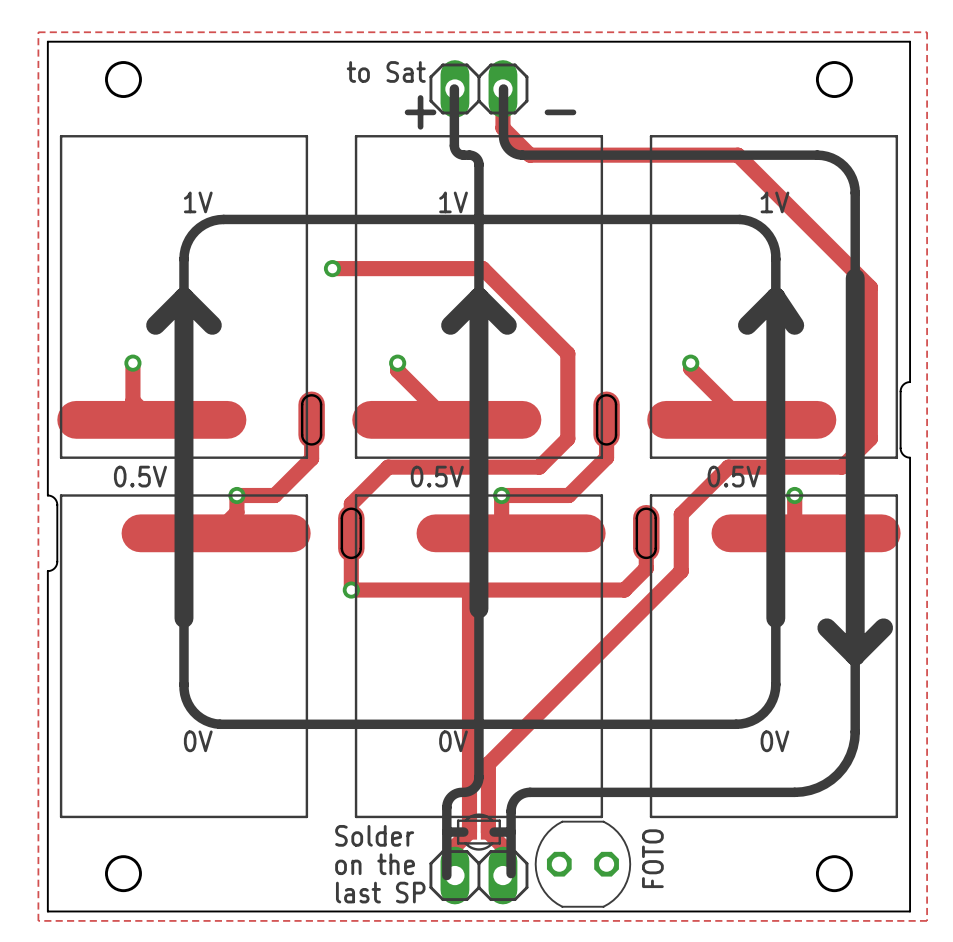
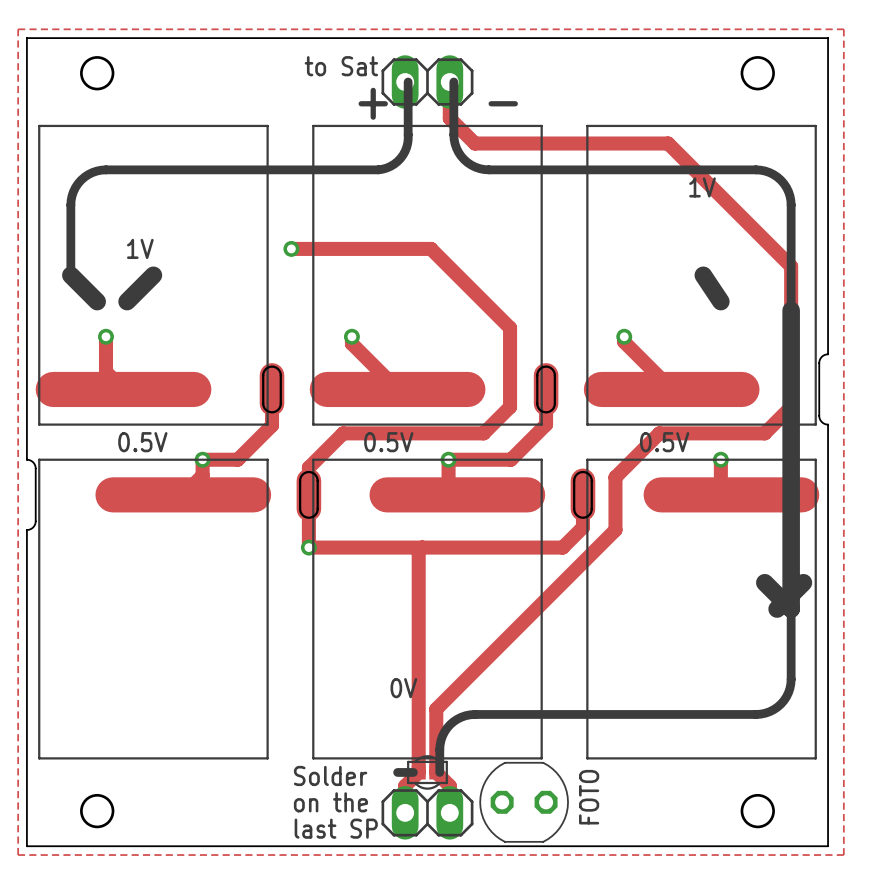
line: (454, 88) (454, 148) (460, 154) (474, 156) (478, 163) (478, 293) -> none
line: none -> (408, 82) (407, 143) (400, 158) (386, 168) (378, 169) (105, 169) (92, 172) (84, 177) (75, 187) (71, 200) (70, 275) (97, 301)
line: (503, 88) (504, 141) (509, 149) (517, 154) (817, 155) (836, 160) (850, 174) (855, 192) (855, 656) (826, 627) -> none
line: none -> (453, 82) (455, 143) (464, 159) (479, 168) (756, 169) (773, 174) (786, 187) (791, 204) (791, 609) (764, 582)
text position: 1V (198, 202) -> 1V (140, 248)
text: 1V (453, 202) -> none
line: (183, 296) (184, 689) (188, 703) (197, 715) (205, 720) (219, 724) (736, 724) (751, 721) (760, 716) (770, 704) (775, 684) (775, 296) -> none
line: (183, 296) (212, 325) -> none
line: (183, 296) (184, 253) (189, 239) (203, 224) (223, 219) (744, 220) (762, 228) (773, 244) (775, 254) (775, 296) -> none
line: (478, 296) (478, 777) (474, 787) (463, 792) -> none
line: (478, 296) (507, 325) -> none
line: (478, 296) (450, 325) -> none
line: (775, 296) (747, 325) -> none
text position: 0.5V (140, 476) -> 0.5V (142, 442)
line: (855, 627) (854, 739) (847, 762) (831, 779) (810, 790) (794, 792) (525, 793) (515, 799) (511, 808) (511, 873) -> none
line: none -> (791, 617) (789, 688) (783, 700) (769, 711) (756, 714) (470, 714) (457, 719) (444, 732) (440, 745) (439, 772)
text: 0V (198, 741) -> none
text: 0V (774, 741) -> none
line: (461, 792) (451, 796) (446, 805) (446, 875) -> none
line: (494, 832) (511, 832) -> none

